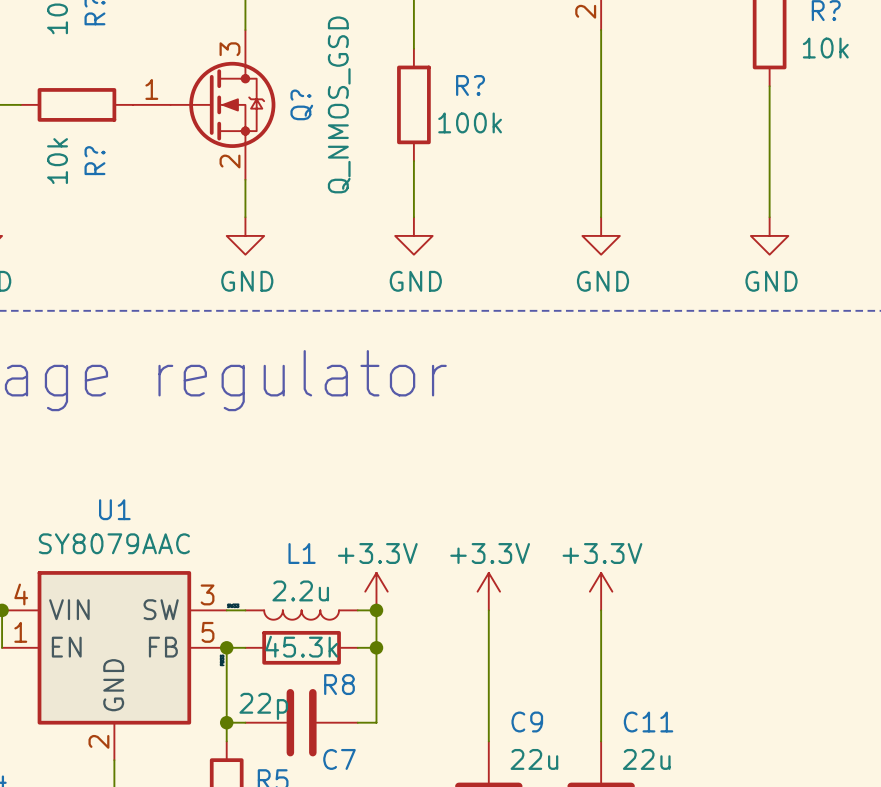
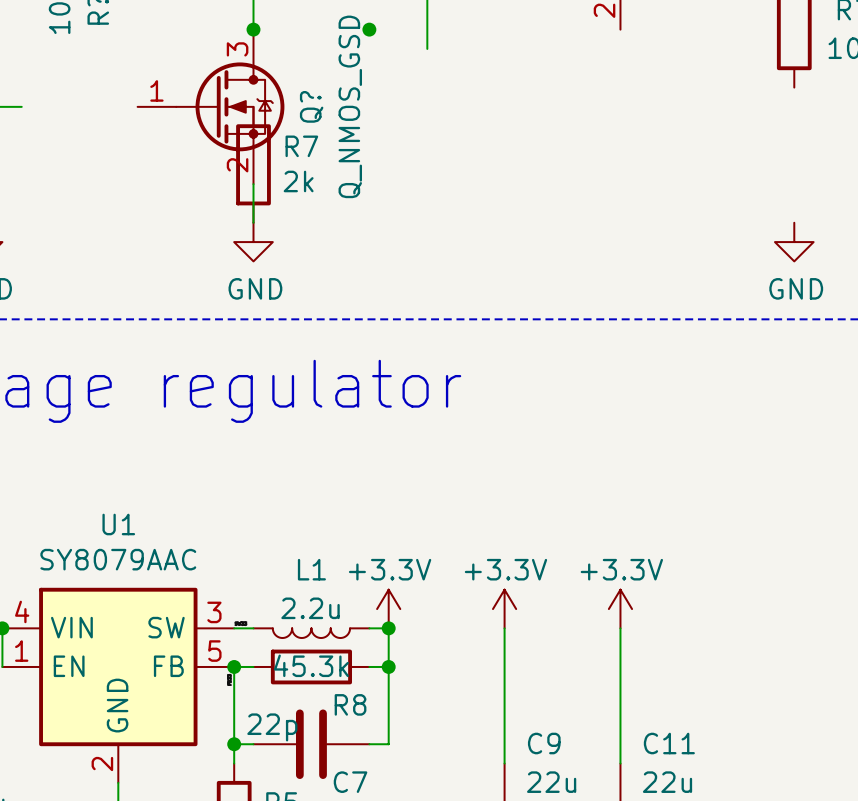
junction: none -> (253, 29)
junction: none -> (369, 29)
wire: (601, 30) (601, 217) -> none
wire: (769, 86) (769, 217) -> none
R?: 10k (76, 104) -> none
R?: 100k (413, 104) -> none
R7: none -> 2k (253, 164)
wire: (413, 161) (413, 217) -> none
power symbol: GND (413, 235) -> none
power symbol: GND (601, 235) -> none

